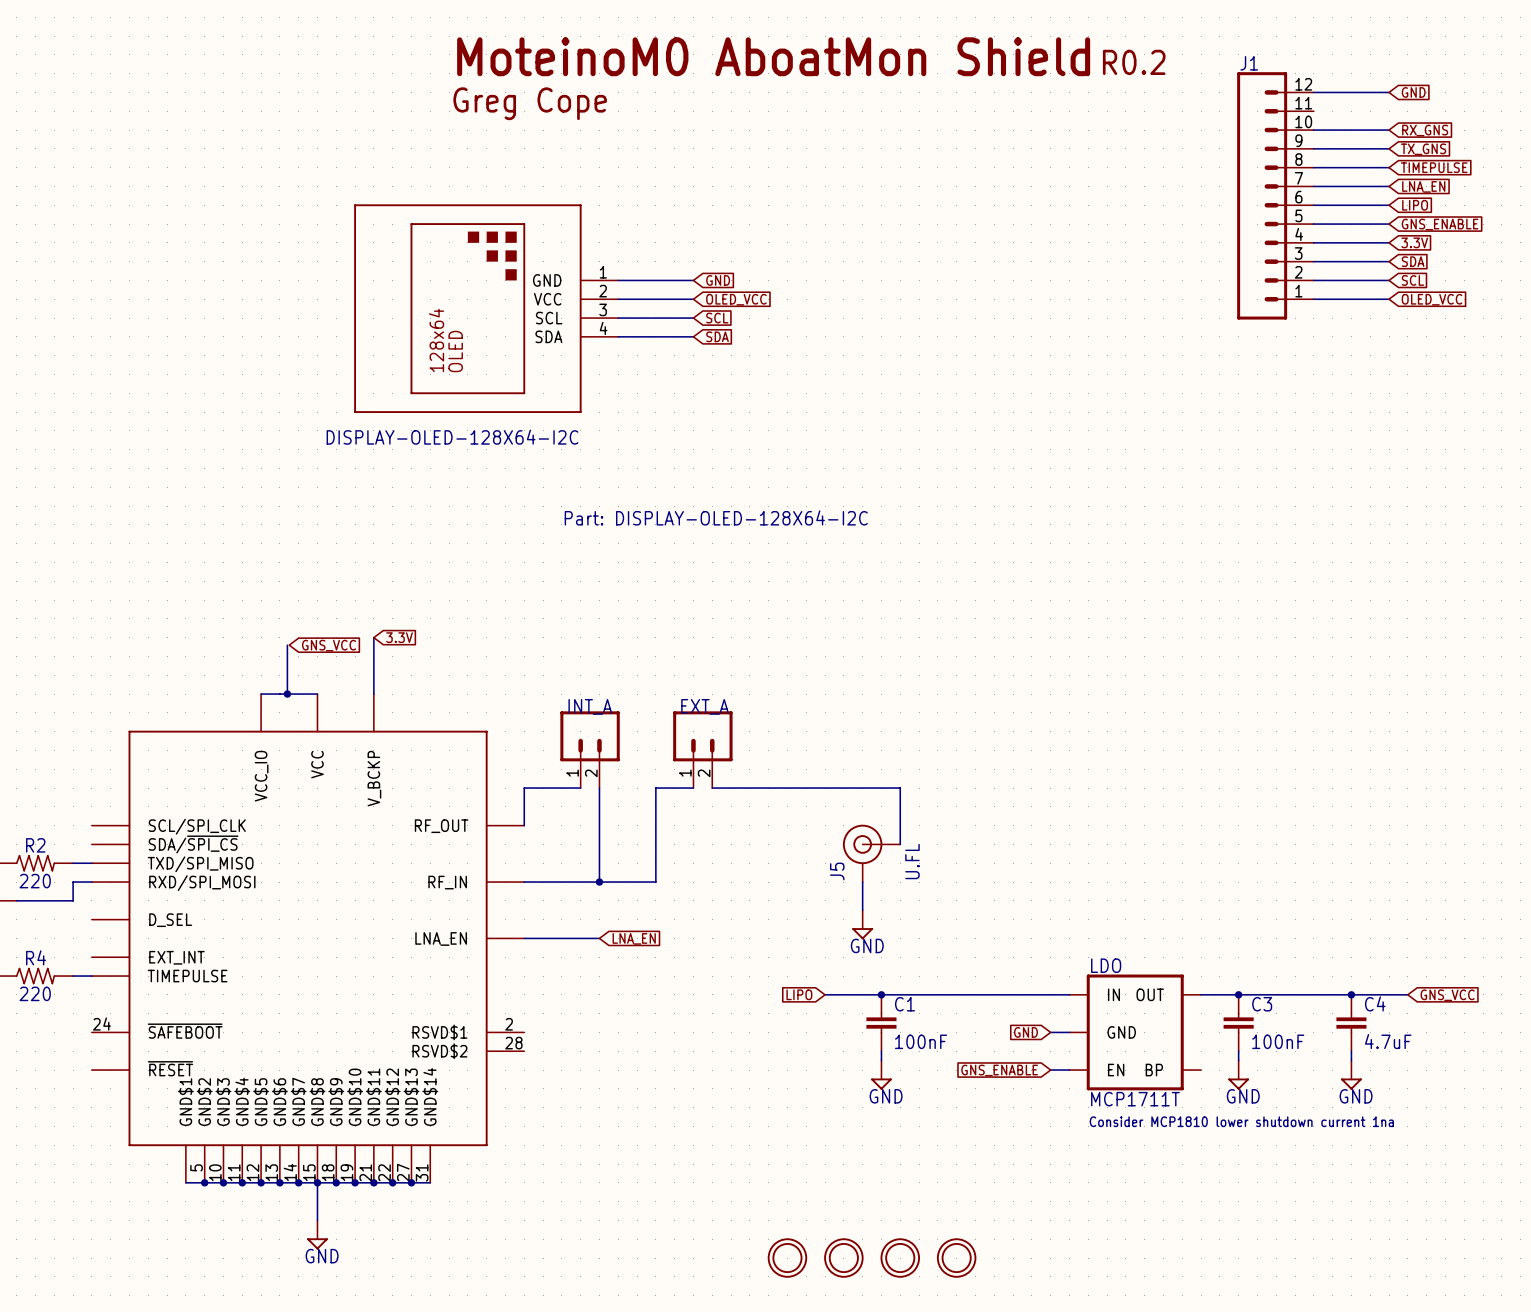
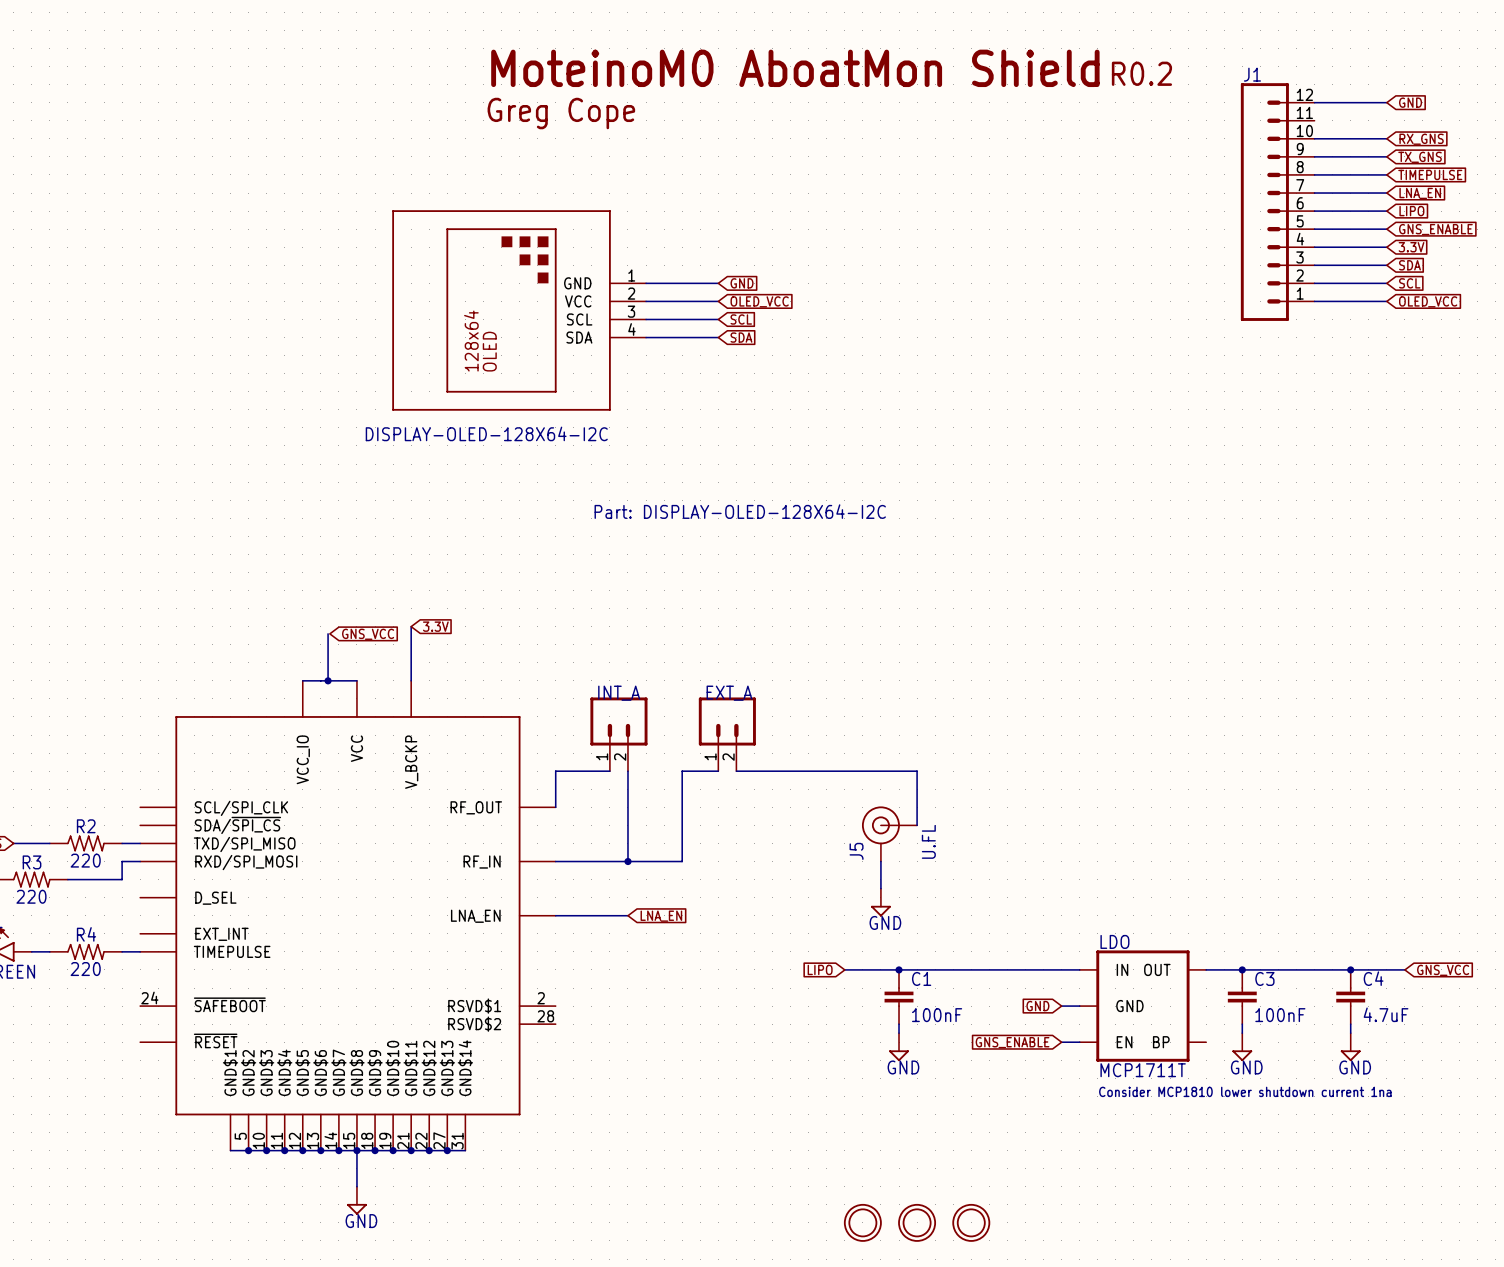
part: (787, 1258) -> none

